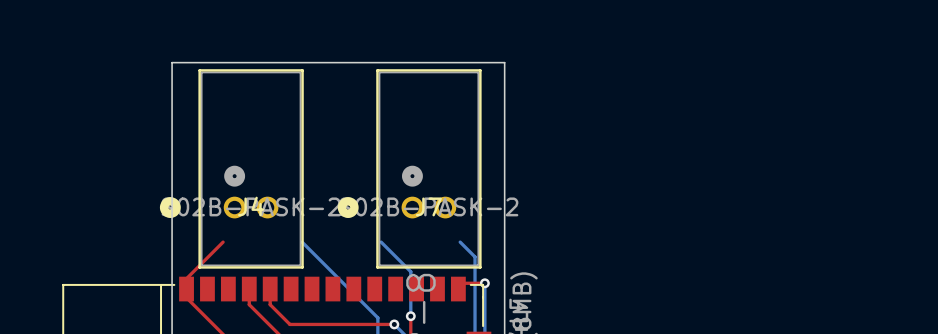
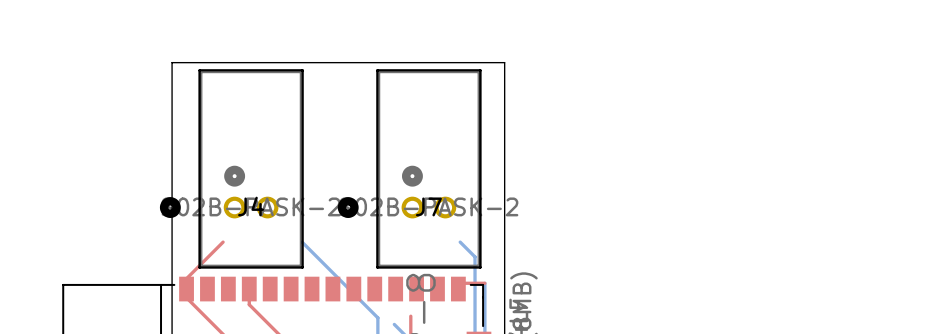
bottom track: (381, 242) (410, 271) (410, 316) -> none
via: (484, 283) -> none
top track: (270, 289) (270, 304) (289, 324) (394, 324) -> none
via: (410, 316) -> none
via: (394, 324) -> none

